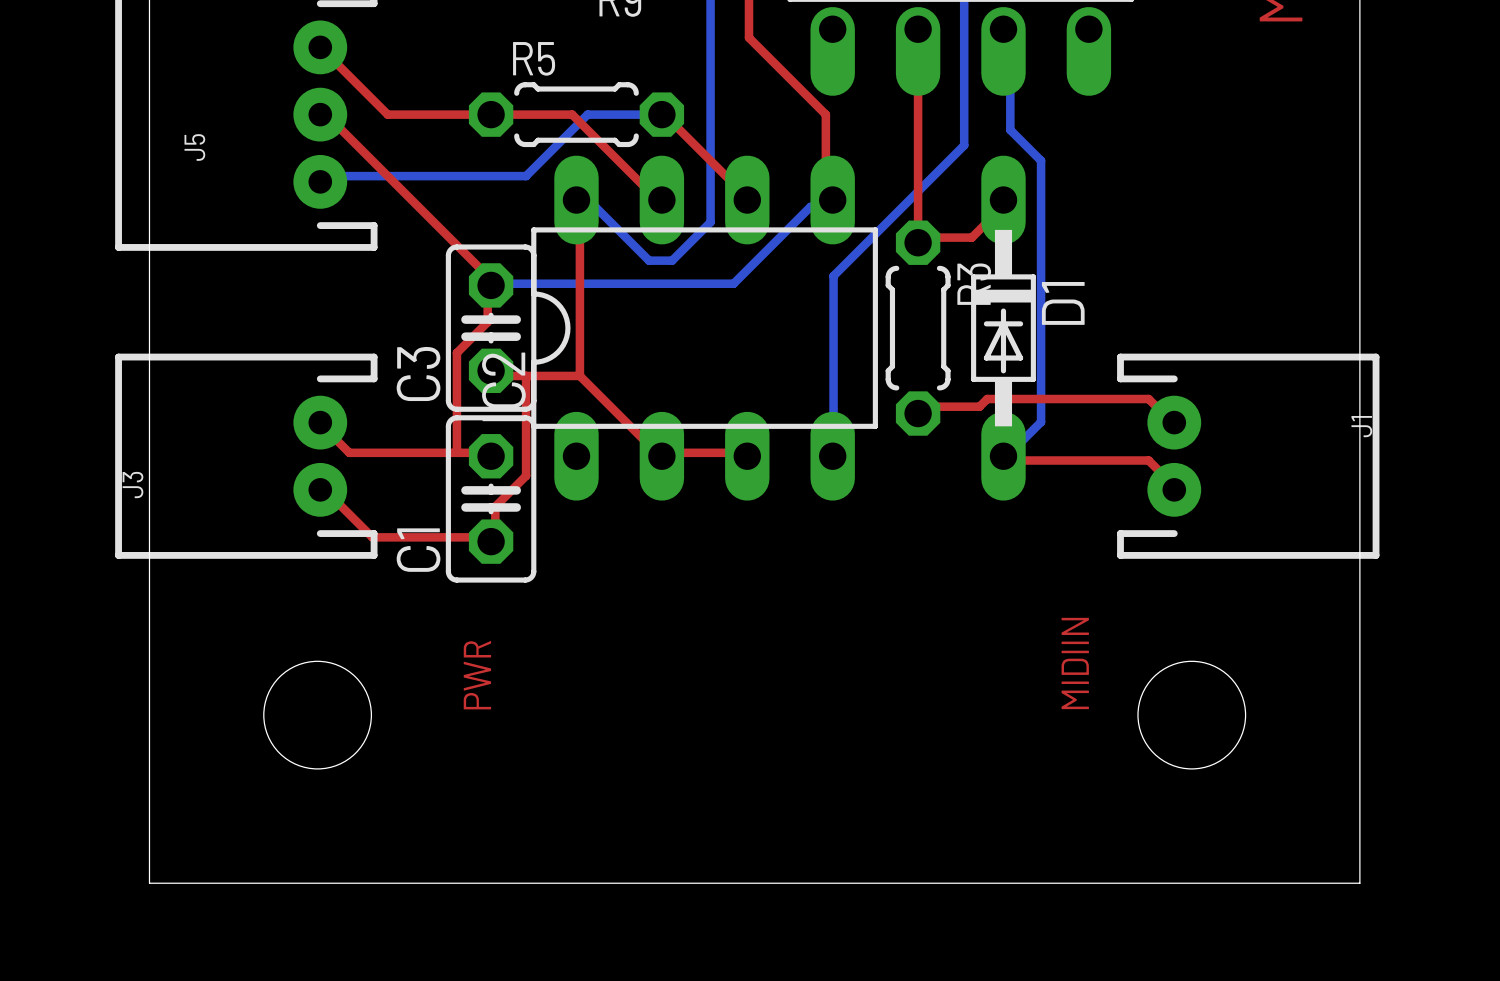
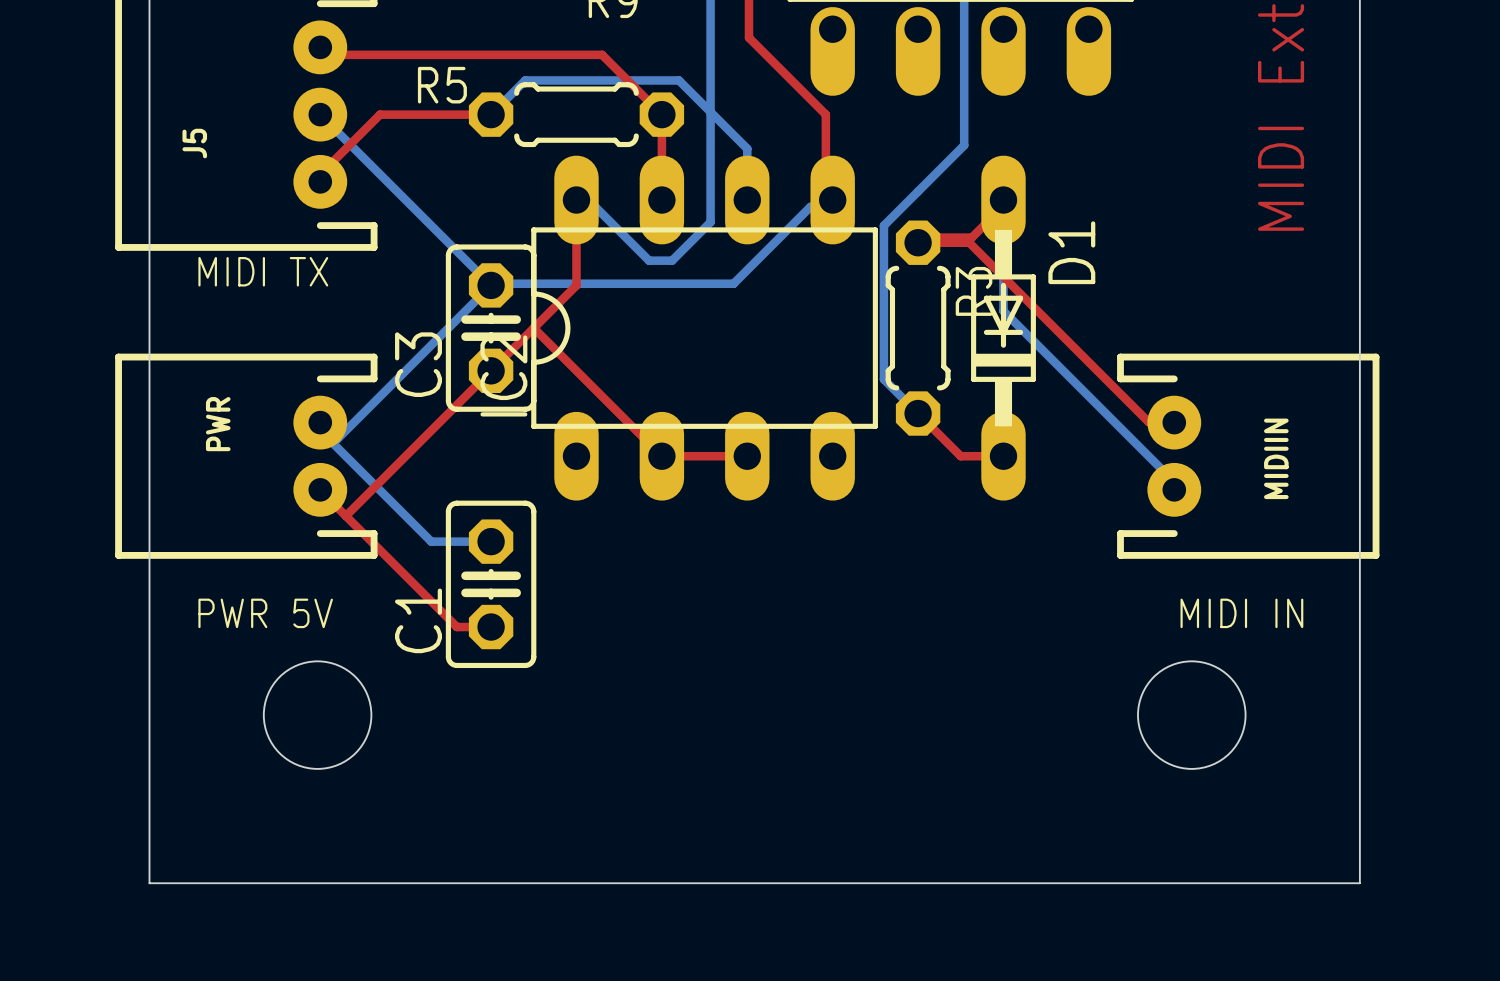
top track: (918, 29) (918, 242) -> none
bottom track: (1003, 29) (1010, 30) (1010, 130) (1041, 160) (1041, 422) (1010, 452) (1003, 456) -> none
top track: (320, 47) (387, 114) -> (320, 181) (320, 174) (380, 114) (387, 114)
R5 name position: R5 (534, 58) -> R5 (442, 85)
top track: (320, 114) (326, 114) (495, 283) (491, 285) (487, 291) (487, 322) (456, 352) (456, 452) -> none
bottom track: none -> (320, 114) (491, 285) (337, 439) (328, 439) (320, 422) (320, 430) (431, 541) (491, 541)
top track: (491, 114) (572, 114) (656, 199) (661, 200) -> (320, 47) (320, 54) (602, 54) (661, 114) (661, 200)
bottom track: none -> (491, 114) (525, 80) (678, 80) (747, 148) (747, 200)
top track: (661, 114) (664, 114) (749, 199) (747, 200) -> none
bottom track: (661, 114) (587, 114) (526, 176) (326, 176) (320, 181) -> none
top track: (576, 200) (579, 206) (579, 375) -> (576, 200) (576, 285) (345, 516)
bottom track: none -> (1003, 200) (1003, 311) (1174, 481) (1174, 489)
bottom track: (883, 225) (833, 276) (832, 456) -> (883, 225) (883, 379) (918, 413)
text: none -> MIDI TX (263, 271)
D1 name position: D1 (1063, 303) -> D1 (1071, 252)
D1 rotation: 0° (1003, 328) -> 180° (1003, 328)
top track: (491, 370) (495, 375) (579, 375) -> none
top track: (526, 375) (526, 475) (495, 506) (495, 537) (491, 541) (487, 537) (372, 537) (326, 491) (320, 489) -> (491, 627) (456, 627) (320, 490)
top track: (579, 375) (661, 456) (664, 452) (741, 452) (747, 456) -> (533, 328) (661, 456) (747, 456)
top track: (918, 413) (918, 406) (979, 406) (987, 399) (1148, 399) (1174, 422) -> (918, 242) (969, 242) (1148, 422) (1174, 422)
top track: (320, 422) (349, 452) (487, 452) (491, 456) -> none
J1 name: J1 (1361, 426) -> MIDIIN (1276, 458)
top track: (1003, 456) (1010, 460) (1148, 460) (1171, 483) (1174, 489) -> (1003, 456) (960, 456) (918, 413)
J3 name: J3 (132, 485) -> PWR (218, 424)
C1 position: (491, 498) -> (491, 584)
text: none -> PWR 5V (265, 613)
text: none -> MIDI IN (1241, 613)
text: MIDIIN (1075, 663) -> none
text: PWR (477, 675) -> none

